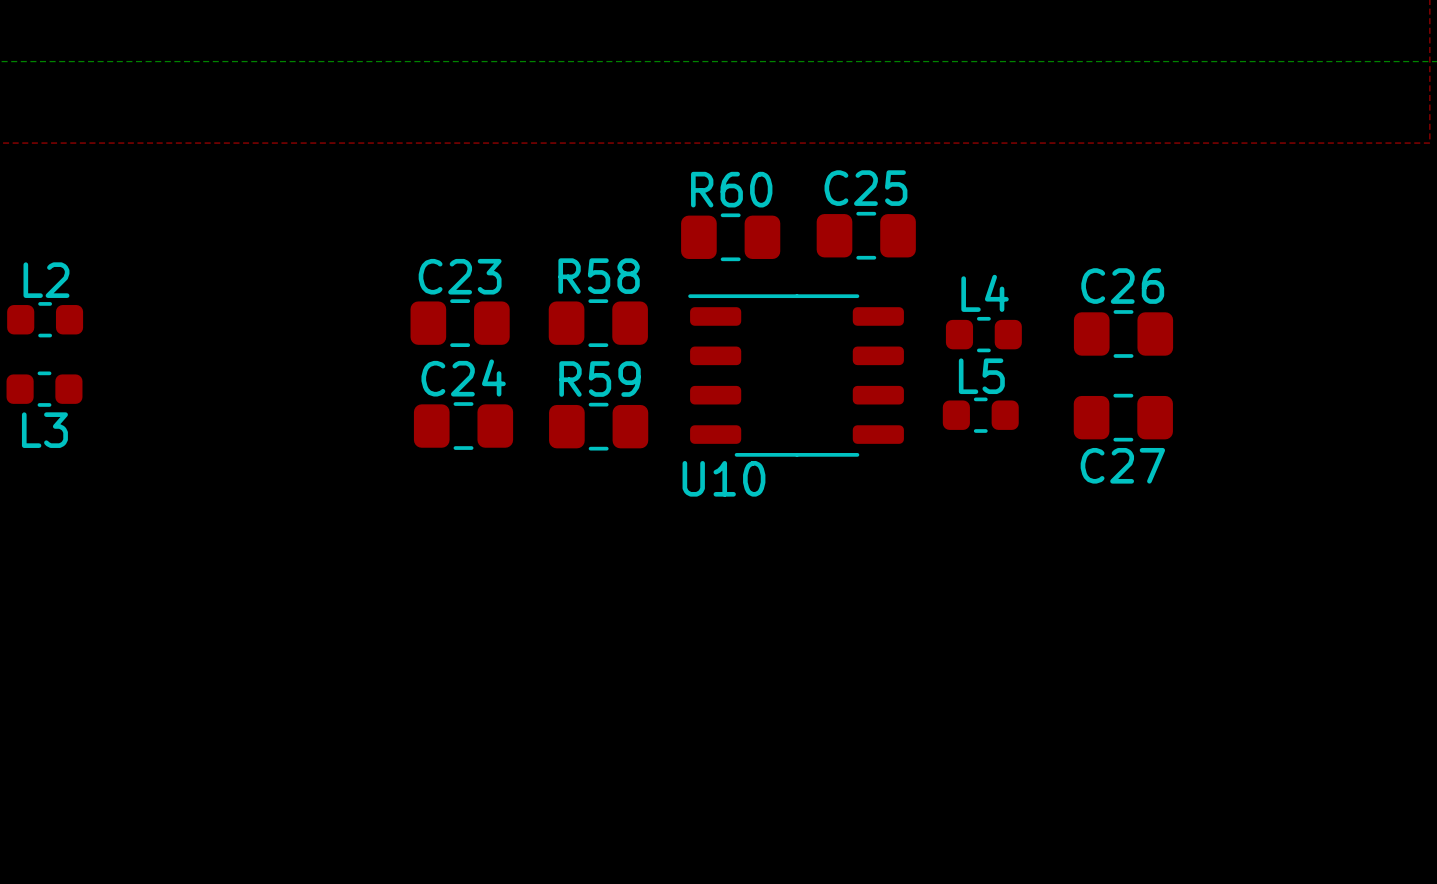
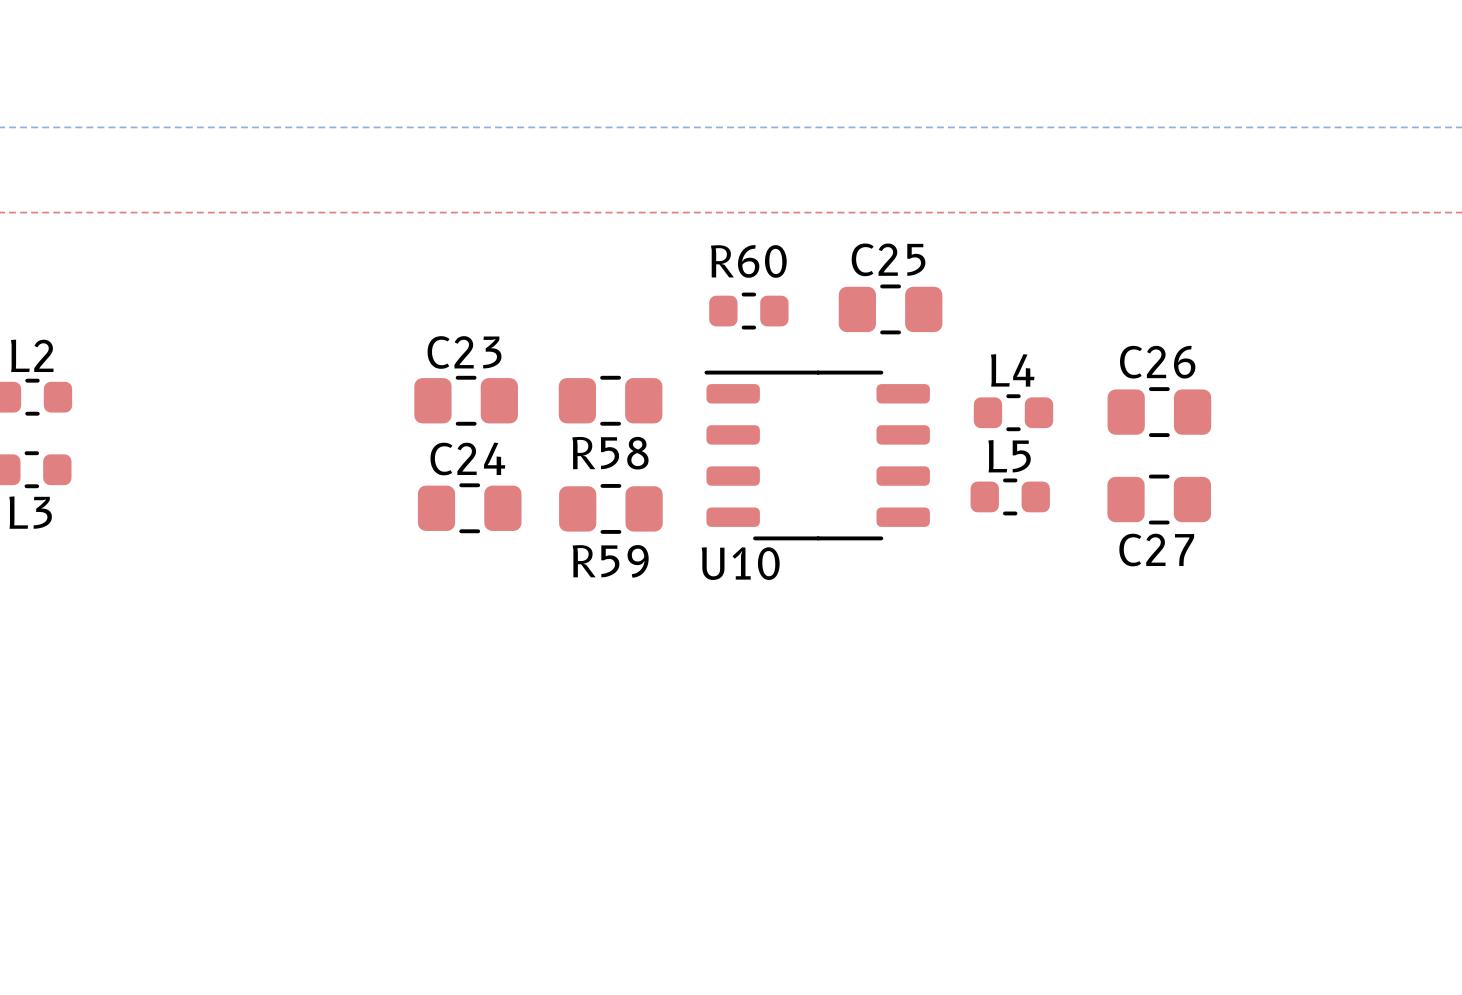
R60 footprint: [681, 213, 781, 262] -> [709, 292, 789, 330]
R58 name position: R58 (599, 276) -> R58 (610, 453)
R59 name position: R59 (600, 379) -> R59 (610, 561)

